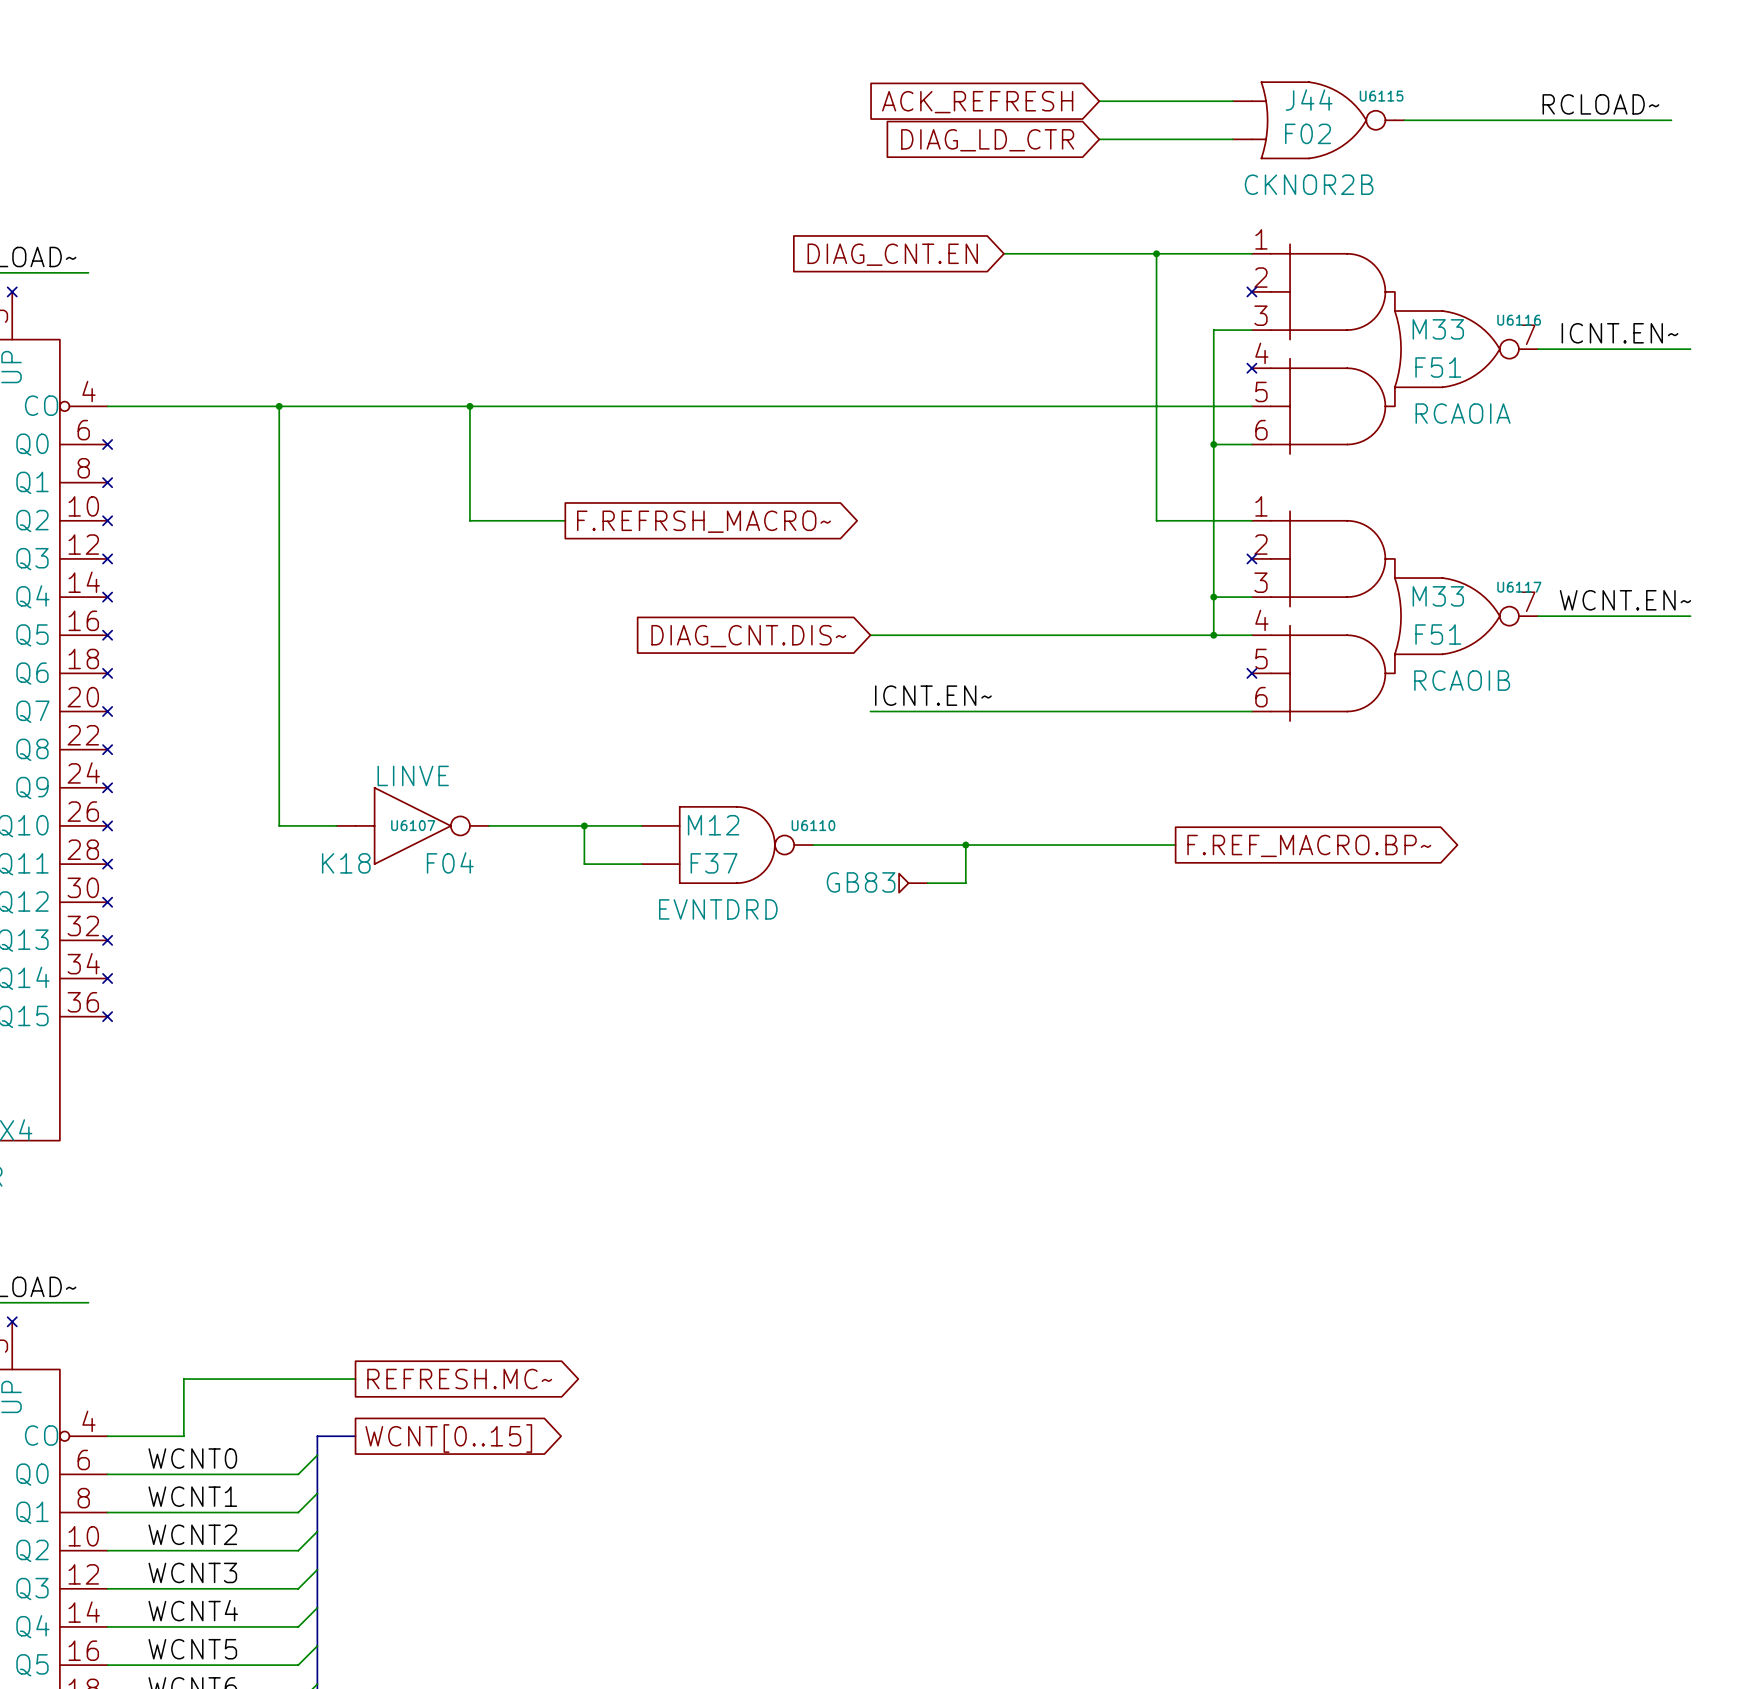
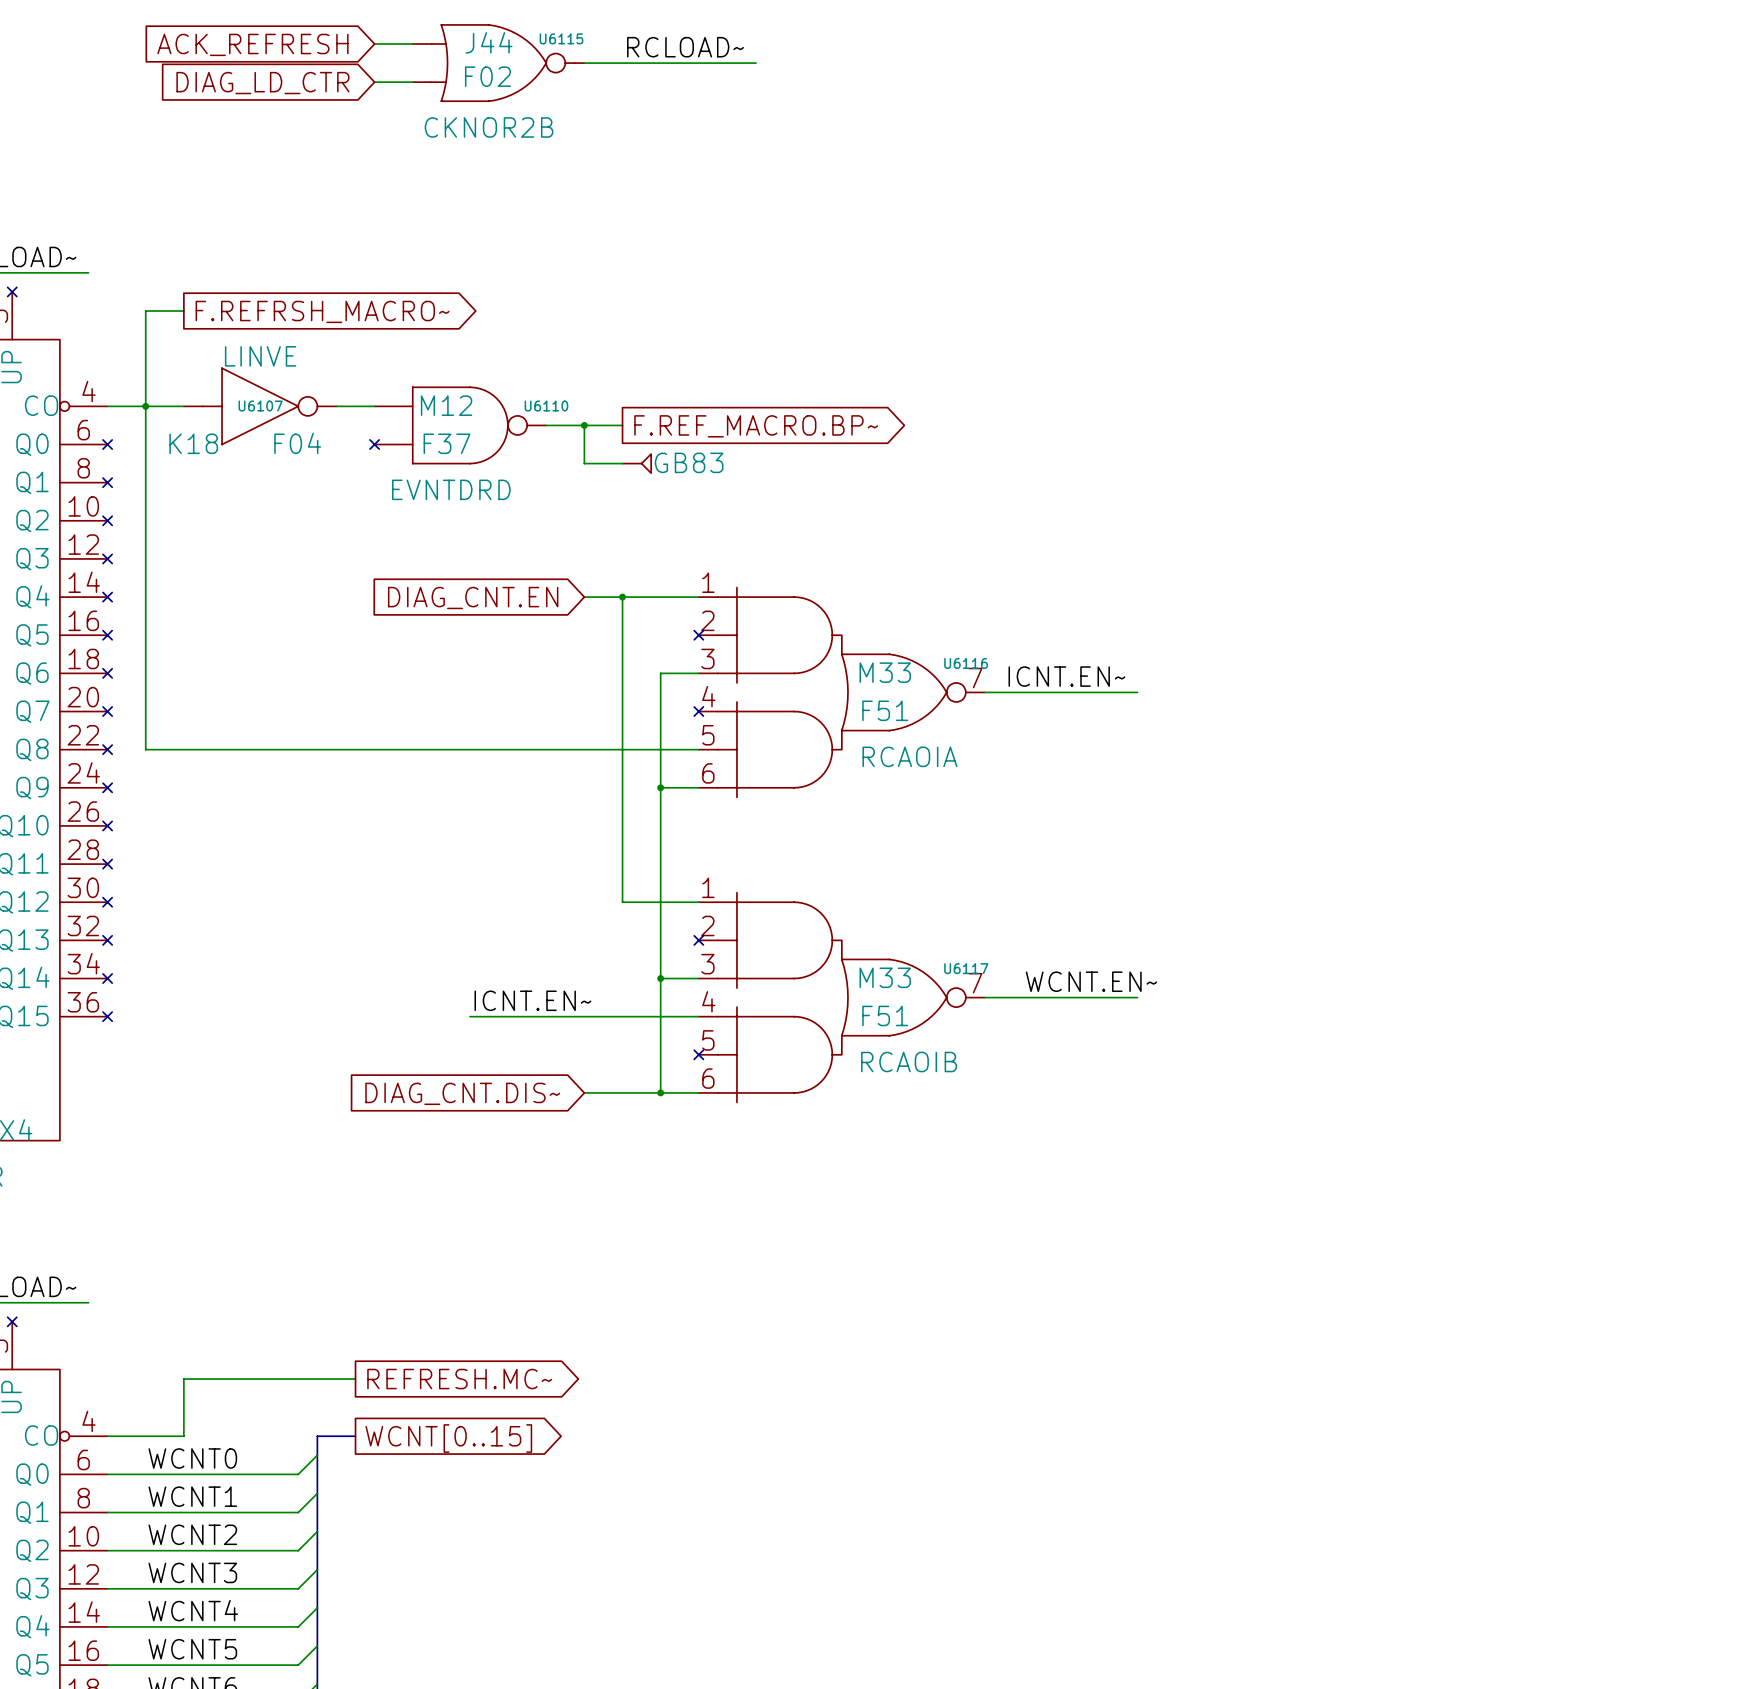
global label: none -> ACK_REFRESH (252, 44)
wire: none -> (374, 44) (412, 44)
label: none -> RCLOAD~ (685, 47)
wire: none -> (584, 63) (756, 63)
wire: none -> (374, 82) (412, 82)
global label: none -> DIAG_LD_CTR (262, 83)
wire: (1099, 101) (1232, 101) -> none
global label: ACK_REFRESH (977, 102) -> none
label: RCLOAD~ (1600, 104) -> none
U6115 position: (1318, 120) -> (498, 63)
wire: (1404, 120) (1671, 120) -> none
wire: (1099, 139) (1232, 139) -> none
global label: DIAG_LD_CTR (987, 140) -> none
wire: (1003, 253) (1251, 253) -> none
wire: (1156, 253) (1156, 520) (1251, 520) -> none
junction: (1156, 253) -> none
global label: DIAG_CNT.EN (892, 254) -> none
no-connect mark: (1251, 291) -> none
wire: none -> (183, 311) (145, 311) (145, 749) (698, 749)
global label: none -> F.REFRSH_MACRO~ (322, 311)
wire: (1251, 330) (1213, 330) (1213, 635) -> none
label: ICNT.EN~ (1620, 333) -> none
U6116 position: (1394, 349) -> (841, 692)
wire: (1537, 349) (1690, 349) -> none
no-connect mark: (1251, 368) -> none
junction: none -> (145, 406)
wire: (183, 406) (336, 406) -> none
wire: (279, 406) (279, 825) (336, 825) -> none
junction: (279, 406) -> none
wire: (374, 406) (1251, 406) -> none
wire: (469, 406) (469, 520) (565, 520) -> none
junction: (469, 406) -> none
wire: none -> (546, 425) (622, 425)
wire: none -> (584, 425) (584, 463) (622, 463)
junction: none -> (584, 425)
global label: none -> F.REF_MACRO.BP~ (756, 426)
no-connect mark: none -> (374, 444)
wire: (1213, 444) (1251, 444) -> none
junction: (1213, 444) -> none
global label: F.REFRSH_MACRO~ (703, 521) -> none
no-connect mark: (1251, 558) -> none
global label: none -> DIAG_CNT.EN (473, 597)
wire: none -> (584, 597) (698, 597)
wire: none -> (622, 597) (622, 902) (698, 902)
junction: none -> (622, 597)
wire: (1213, 597) (1251, 597) -> none
junction: (1213, 597) -> none
label: WCNT.EN~ (1625, 600) -> none
U6117 position: (1394, 616) -> (841, 997)
wire: (1537, 616) (1690, 616) -> none
no-connect mark: none -> (698, 635)
wire: (870, 635) (1251, 635) -> none
junction: (1213, 635) -> none
global label: DIAG_CNT.DIS~ (748, 636) -> none
wire: none -> (698, 673) (660, 673) (660, 1092)
no-connect mark: (1251, 673) -> none
wire: none -> (984, 692) (1137, 692)
label position: ICNT.EN~ (933, 695) -> ICNT.EN~ (1066, 676)
no-connect mark: none -> (698, 711)
wire: (870, 711) (1251, 711) -> none
wire: none -> (660, 787) (698, 787)
junction: none -> (660, 787)
U6107 position: (412, 825) -> (260, 406)
wire: (489, 825) (641, 825) -> none
wire: (584, 825) (584, 864) (641, 864) -> none
junction: (584, 825) -> none
U6110 position: (727, 845) -> (460, 425)
wire: (813, 845) (1175, 845) -> none
wire: (965, 845) (965, 883) (927, 883) -> none
junction: (965, 845) -> none
global label: F.REF_MACRO.BP~ (1309, 845) -> none
GB83 rotation: 0° (903, 883) -> 180° (646, 463)
GB83 position: (913, 883) -> (637, 463)
no-connect mark: none -> (698, 940)
wire: none -> (660, 978) (698, 978)
junction: none -> (660, 978)
label: none -> WCNT.EN~ (1091, 981)
wire: none -> (984, 997) (1137, 997)
label: none -> ICNT.EN~ (532, 1000)
wire: none -> (469, 1016) (698, 1016)
no-connect mark: none -> (698, 1054)
wire: none -> (584, 1092) (698, 1092)
junction: none -> (660, 1092)
global label: none -> DIAG_CNT.DIS~ (462, 1093)

